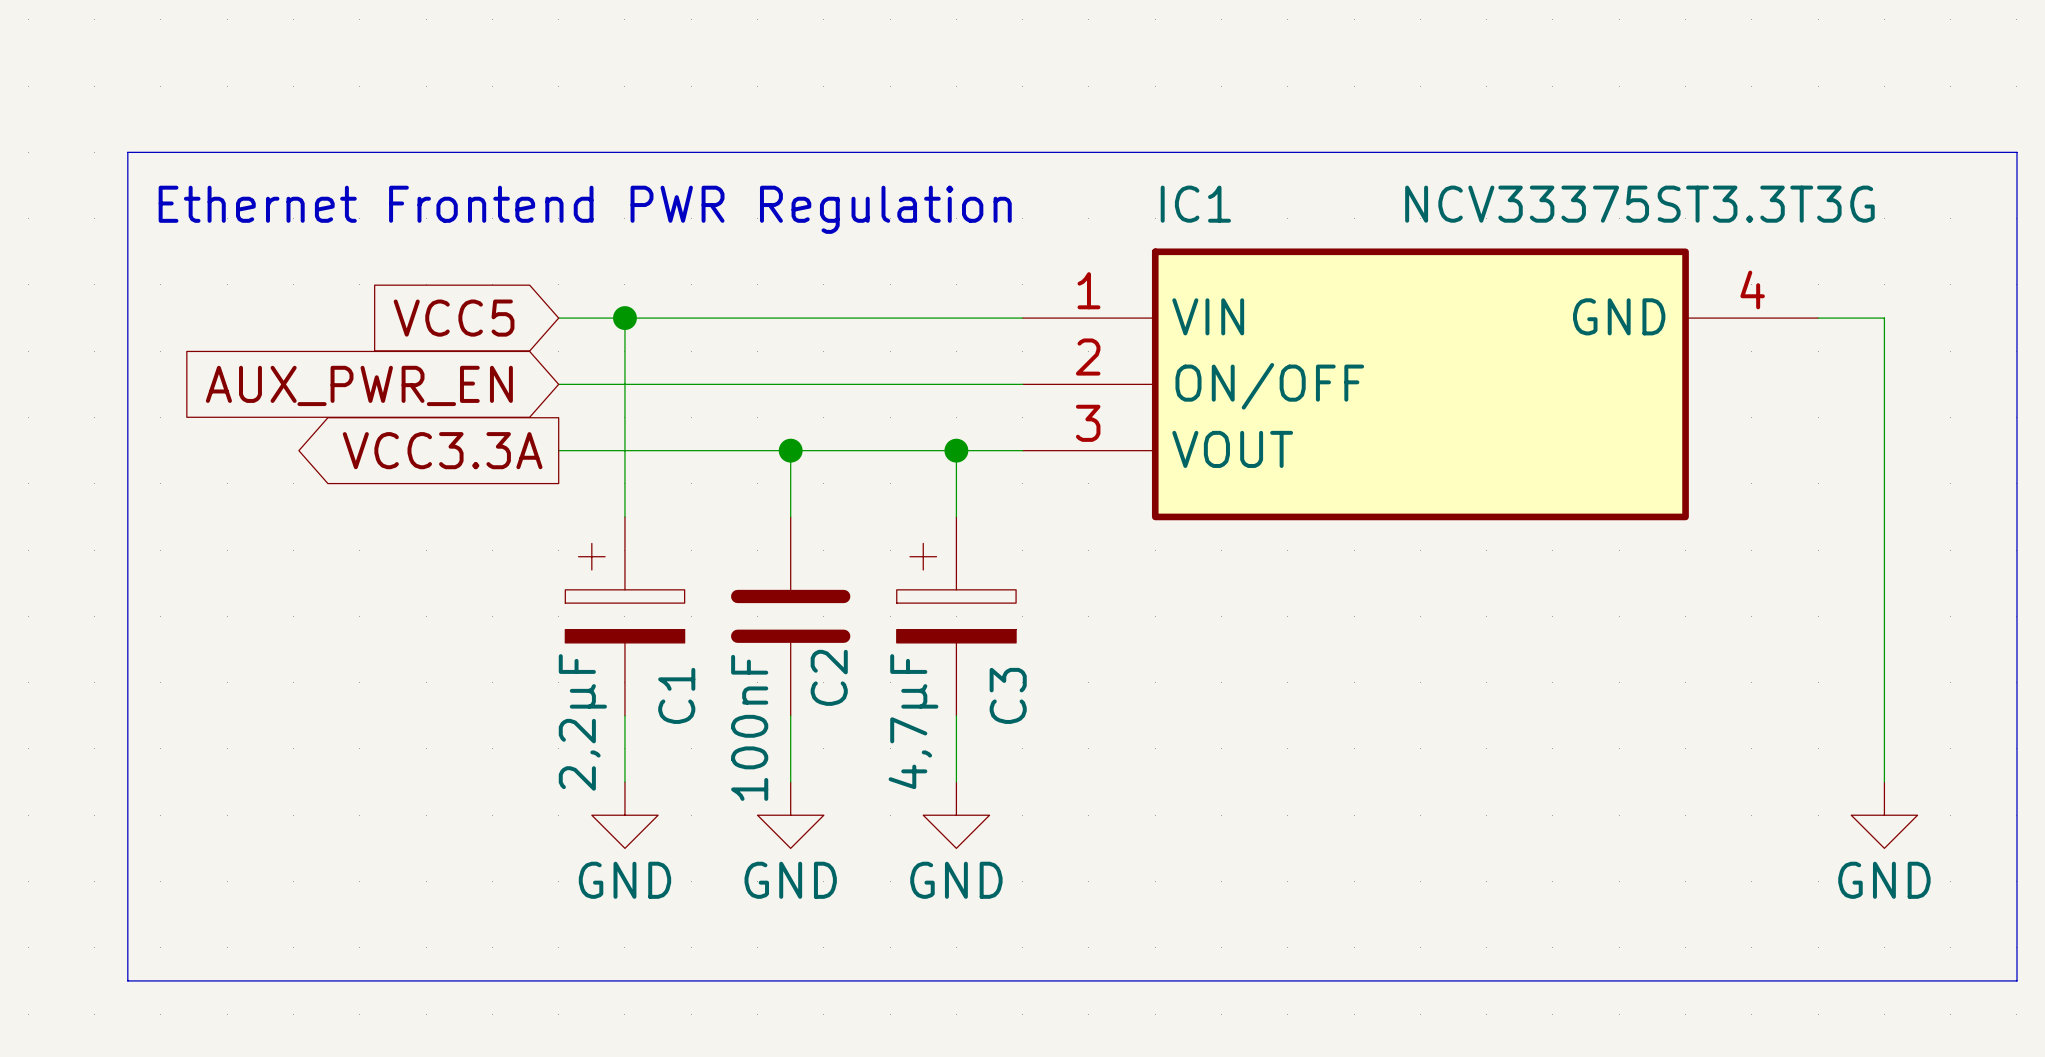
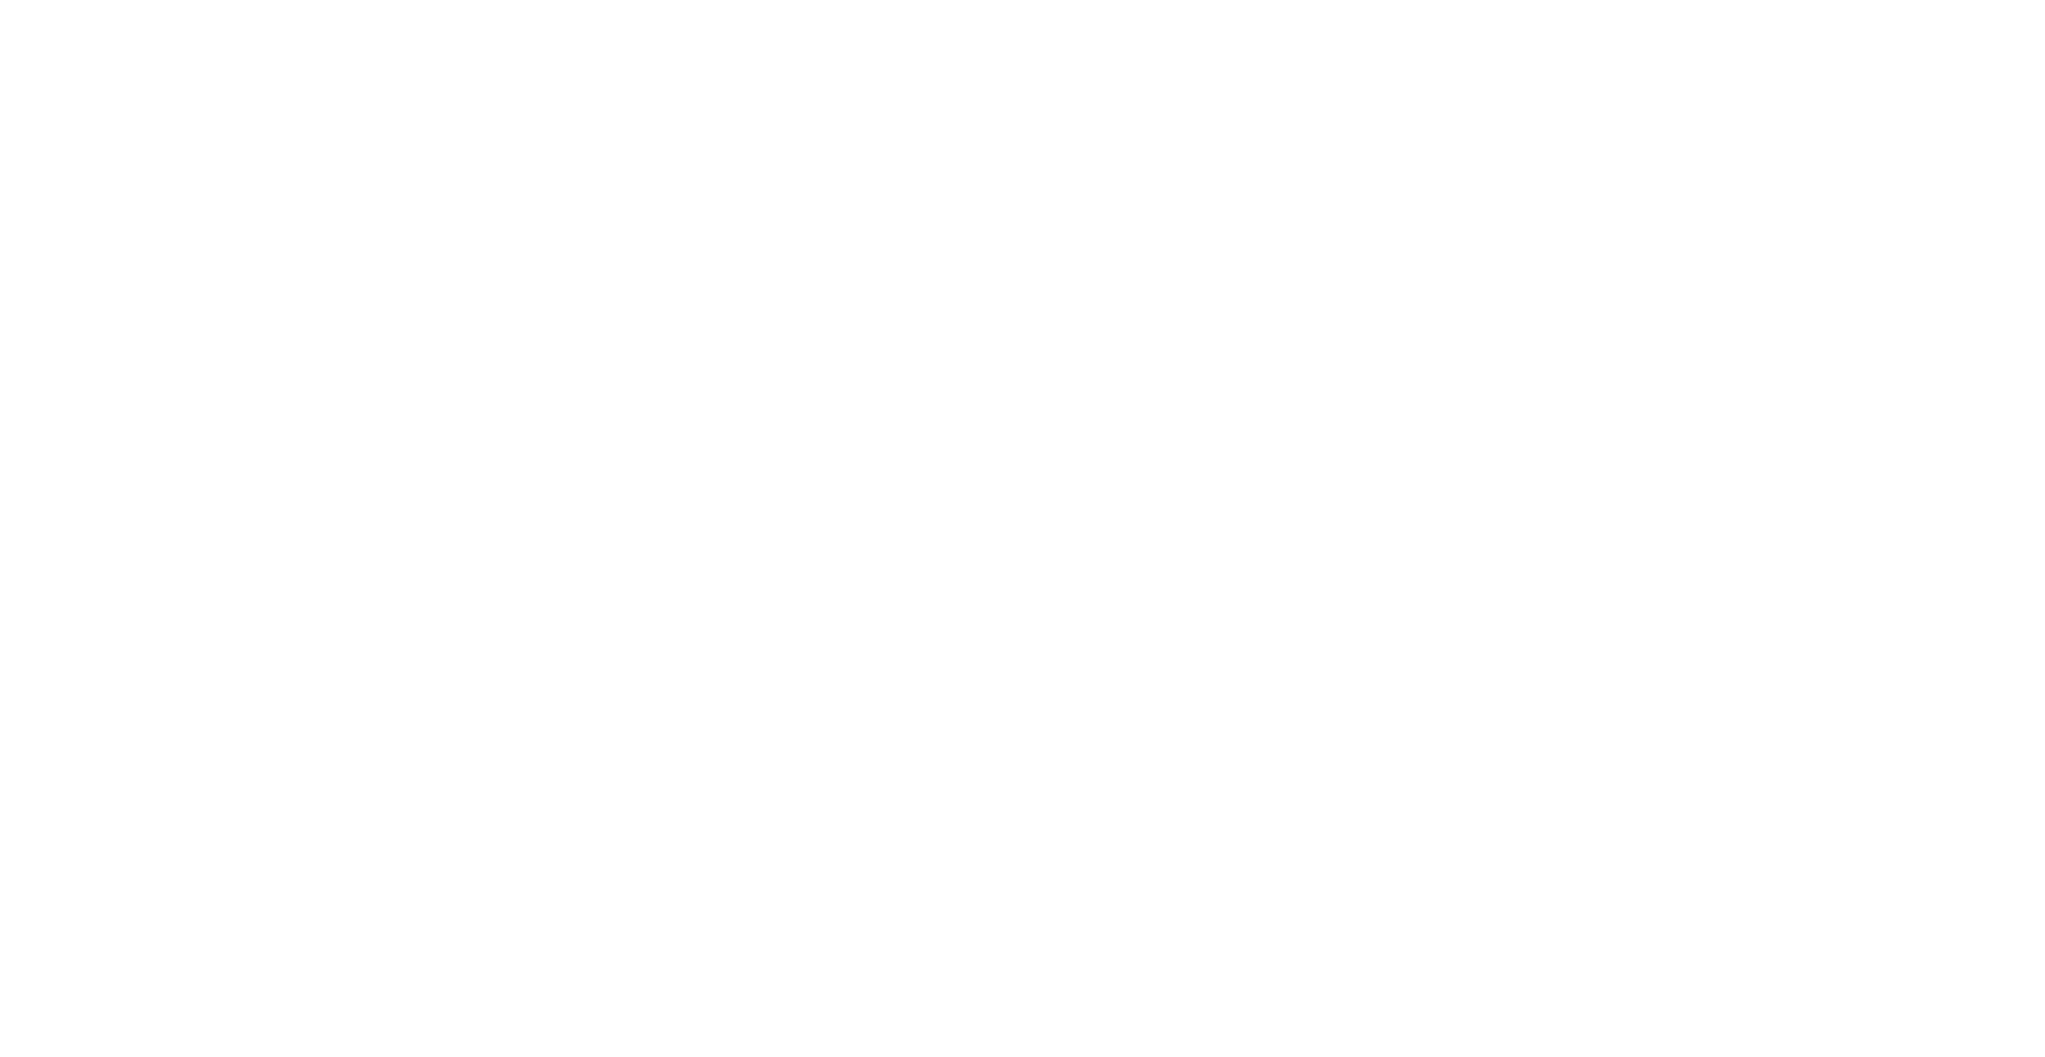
line: (127, 152) (2016, 152) (2016, 980) (127, 980) (127, 152) -> none
text: Ethernet Frontend PWR Regulation (585, 209) -> none
global label: VCC5 (454, 318) -> none
wire: (558, 318) (1022, 318) -> none
wire: (624, 318) (624, 516) -> none
junction: (624, 318) -> none
wire: (1818, 318) (1884, 318) (1884, 782) -> none
wire: (558, 384) (1022, 384) -> none
IC1: NCV33375ST3.3T3G (1420, 384) -> none
global label: AUX_PWR_EN (359, 385) -> none
global label: VCC3.3A (442, 450) -> none
wire: (558, 450) (1022, 450) -> none
wire: (790, 450) (790, 516) -> none
junction: (790, 450) -> none
wire: (956, 450) (956, 516) -> none
junction: (956, 450) -> none
C1: 2,2µF (624, 616) -> none
C2: 100nF (790, 616) -> none
C3: 4,7µF (956, 616) -> none
wire: (624, 715) (624, 782) -> none
wire: (790, 715) (790, 782) -> none
wire: (956, 715) (956, 782) -> none
power symbol: GND (624, 815) -> none
power symbol: GND (790, 815) -> none
power symbol: GND (956, 815) -> none
power symbol: GND (1884, 815) -> none

